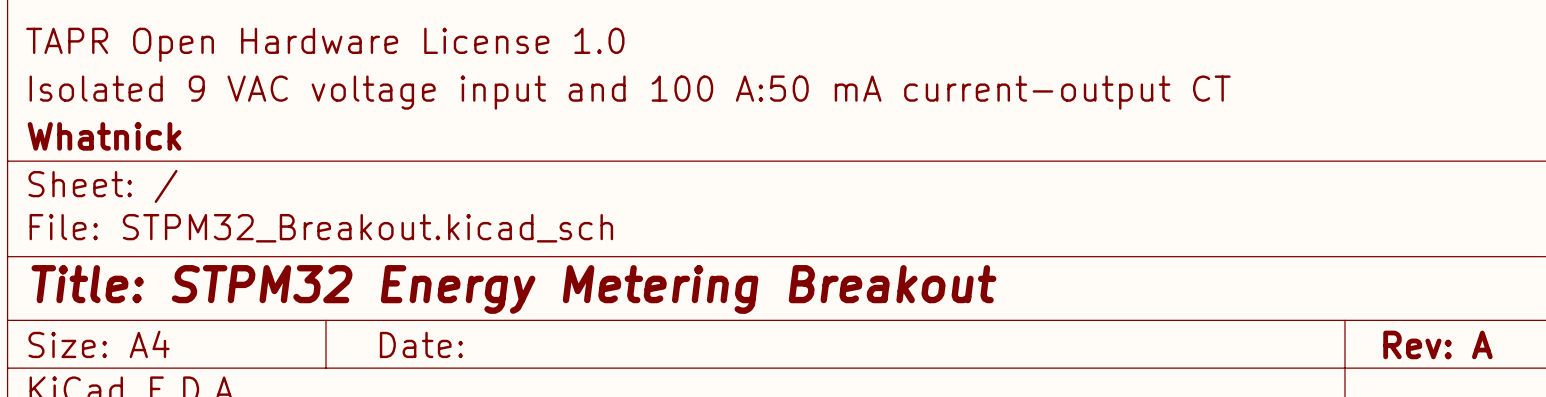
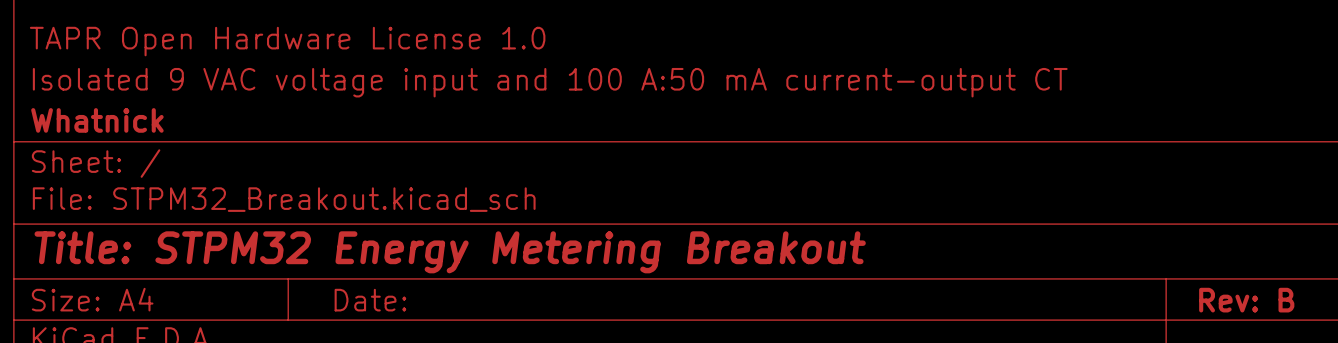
title block: Rev: A (1437, 344) -> Rev: B (1246, 300)

